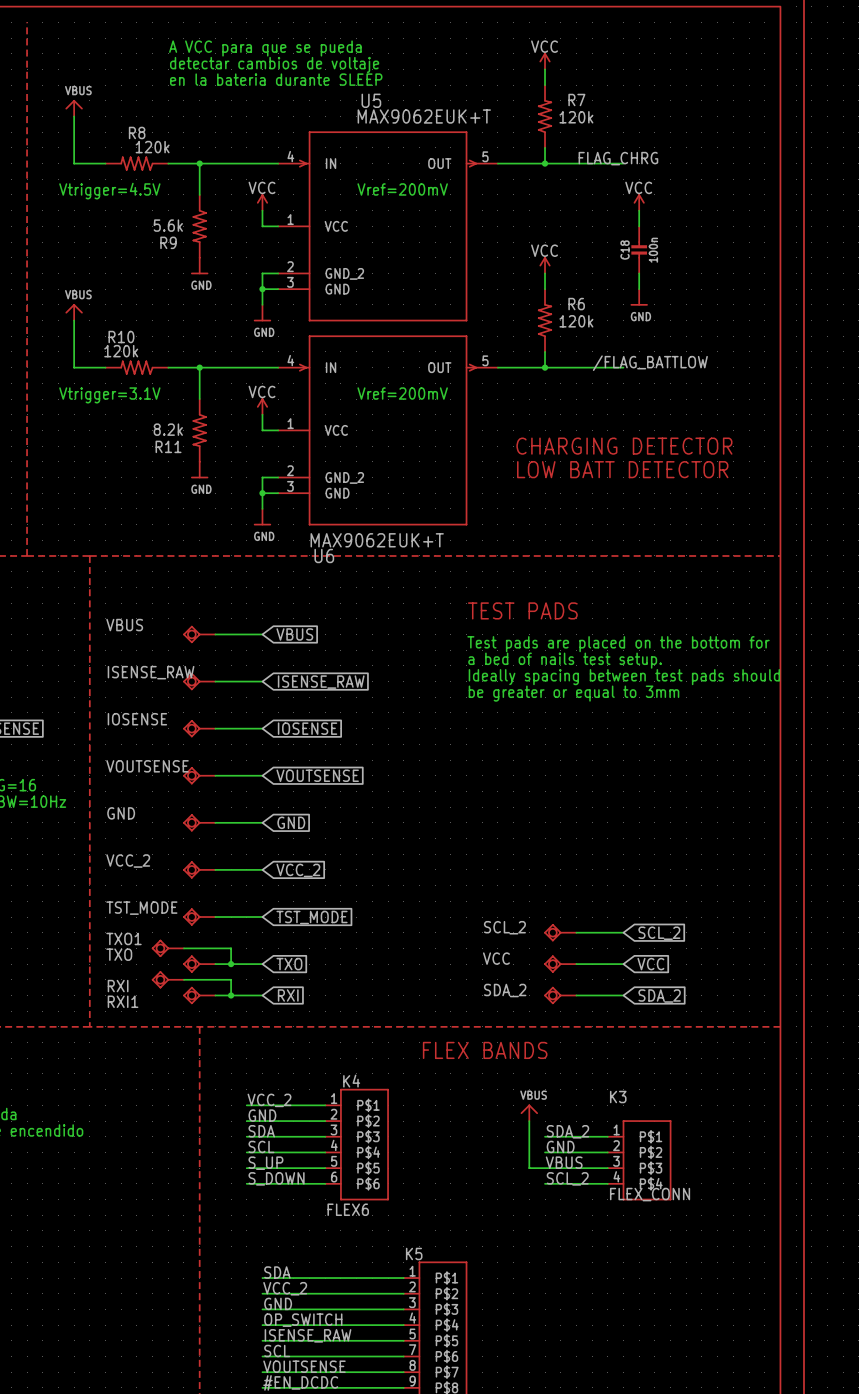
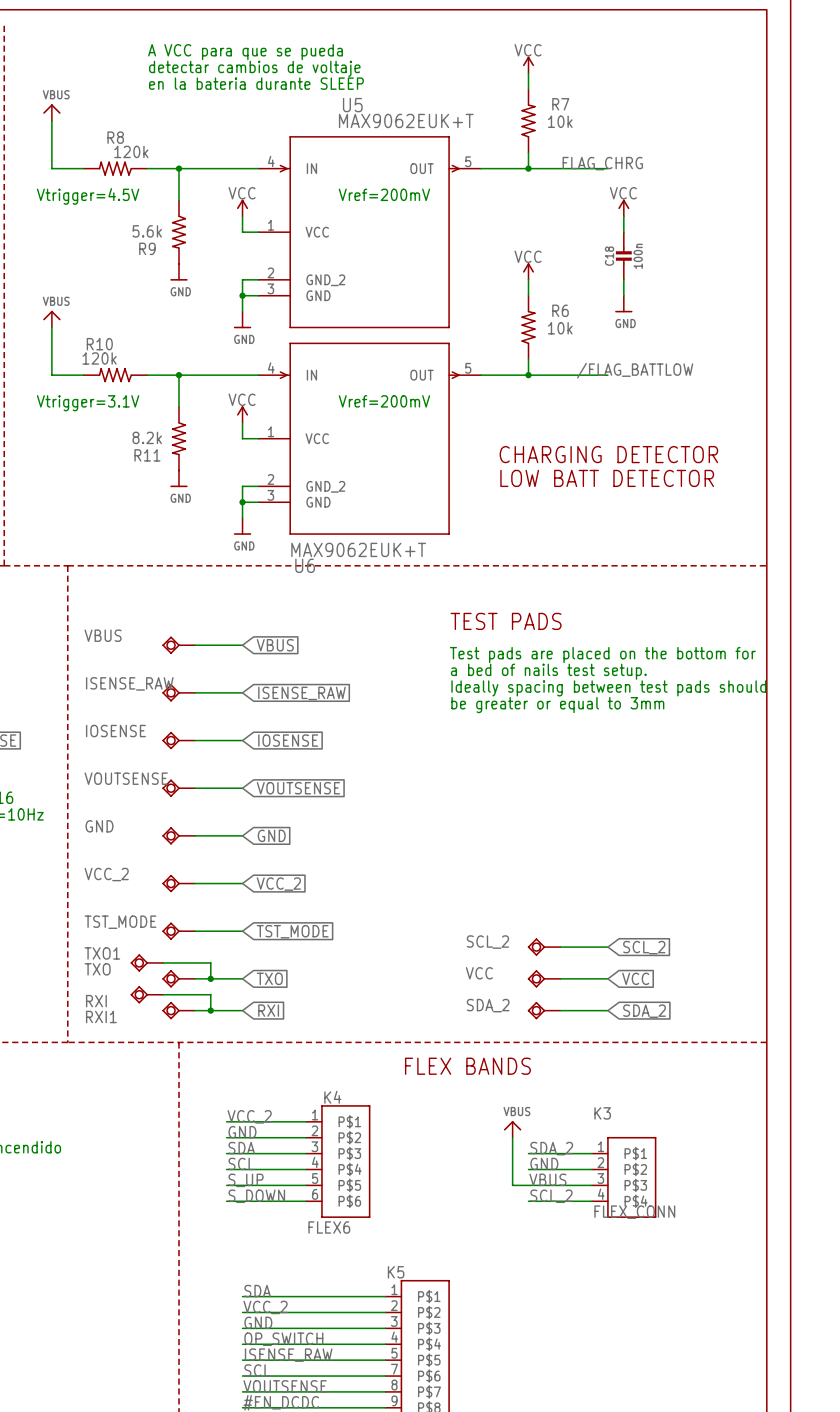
R7 value: 120k (576, 117) -> 10k (560, 121)
R6 value: 120k (576, 321) -> 10k (560, 328)

